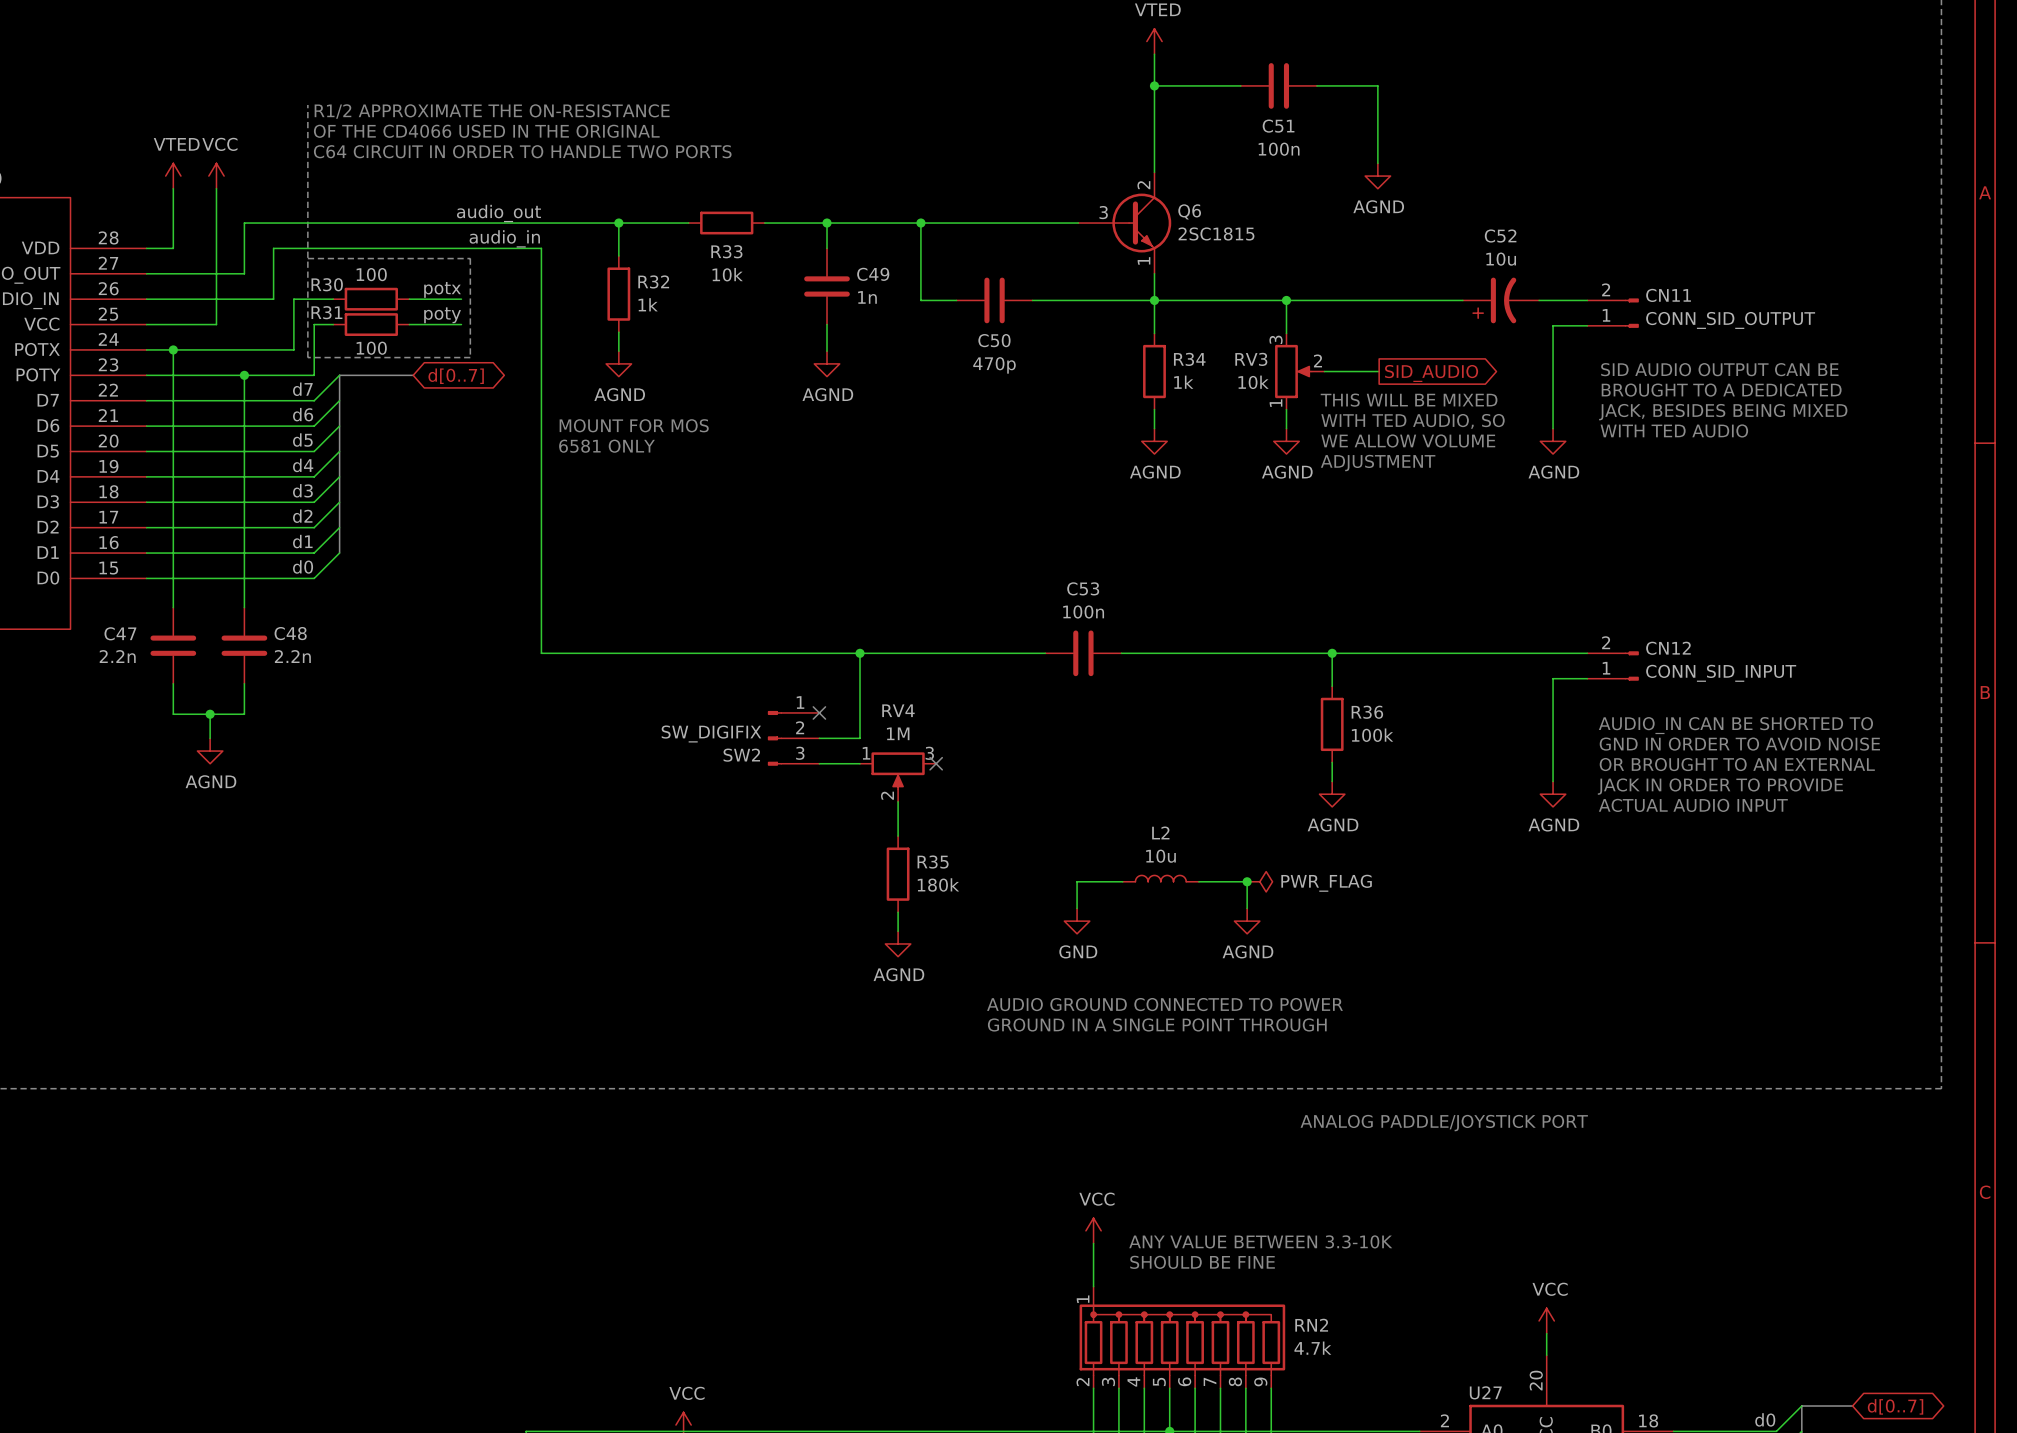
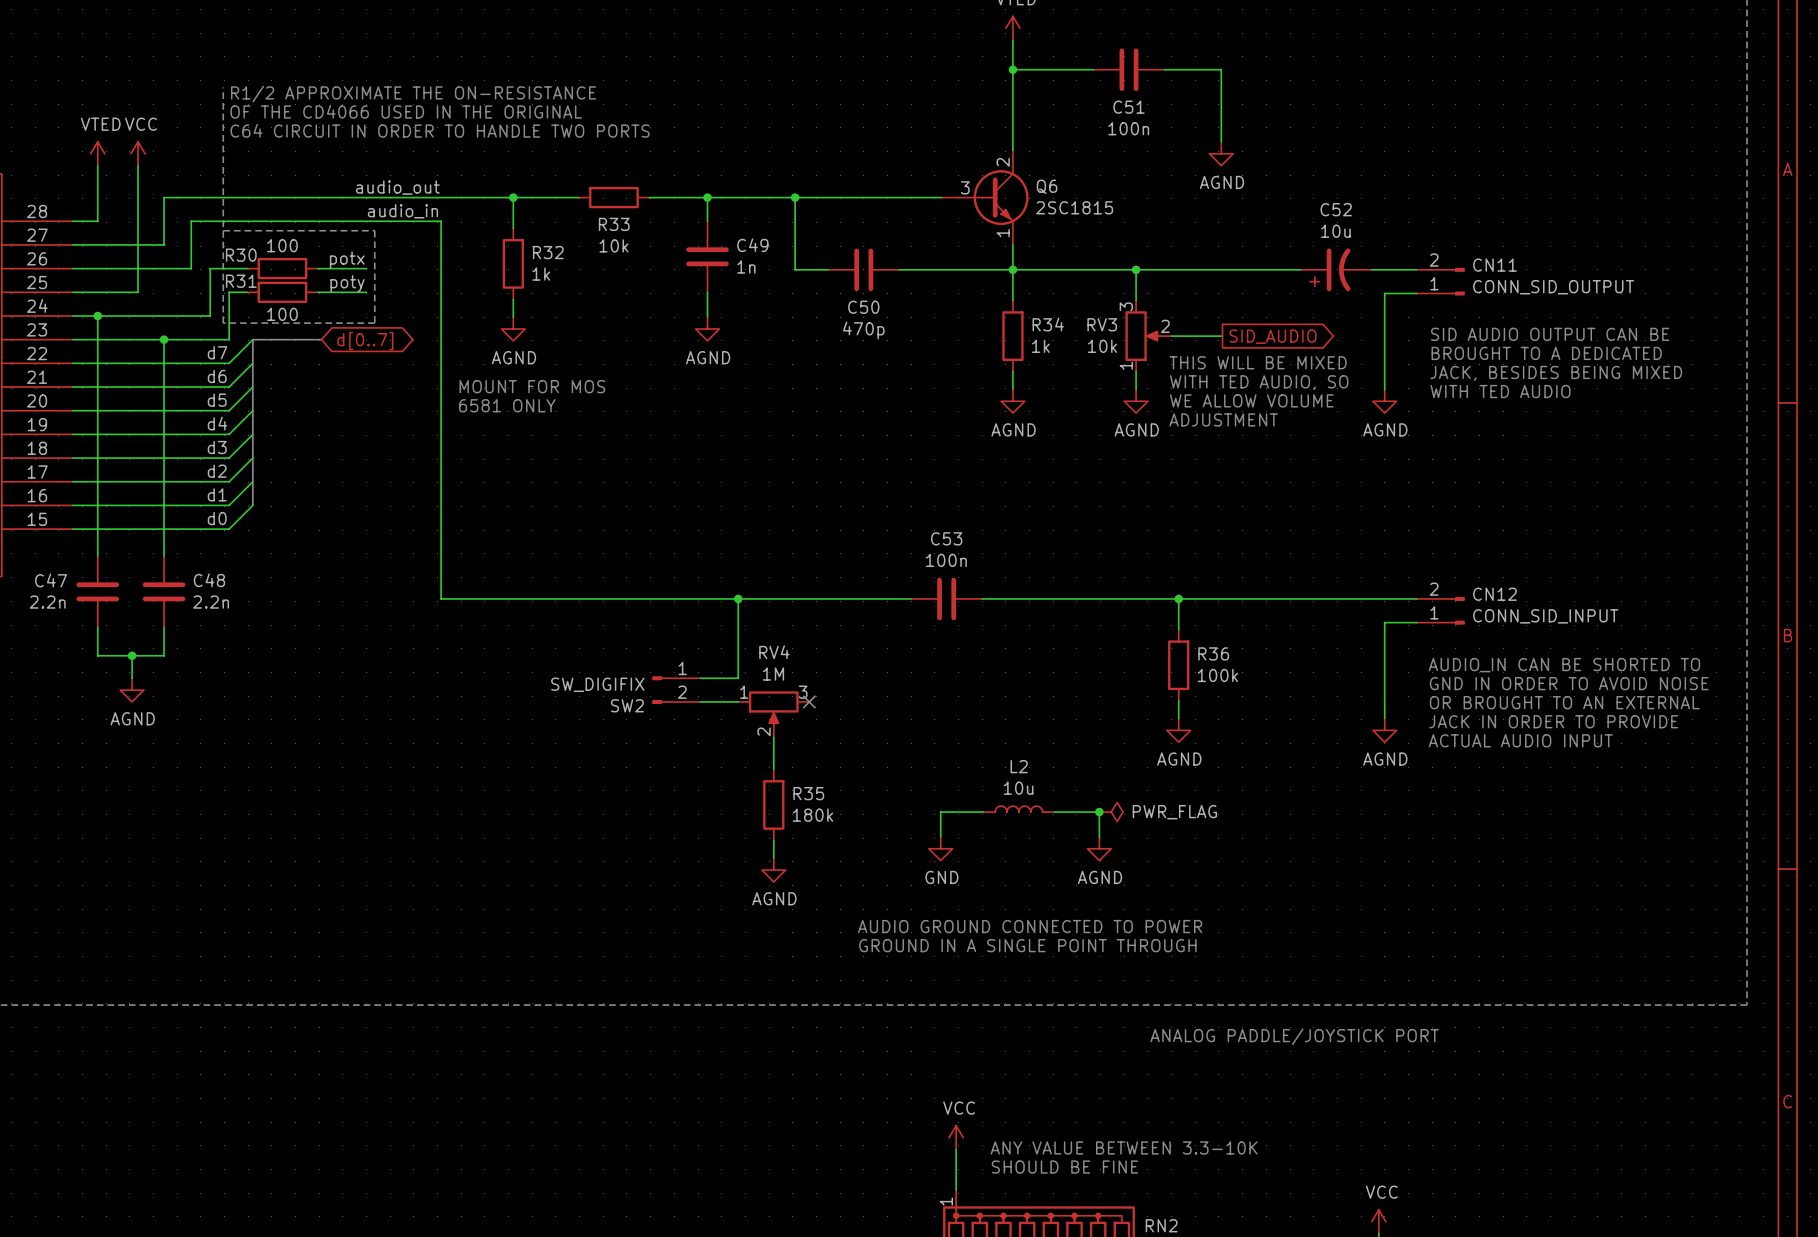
SW2 symbol: [767, 710, 820, 766] -> [652, 676, 701, 704]
no-connect mark: (819, 712) -> none

